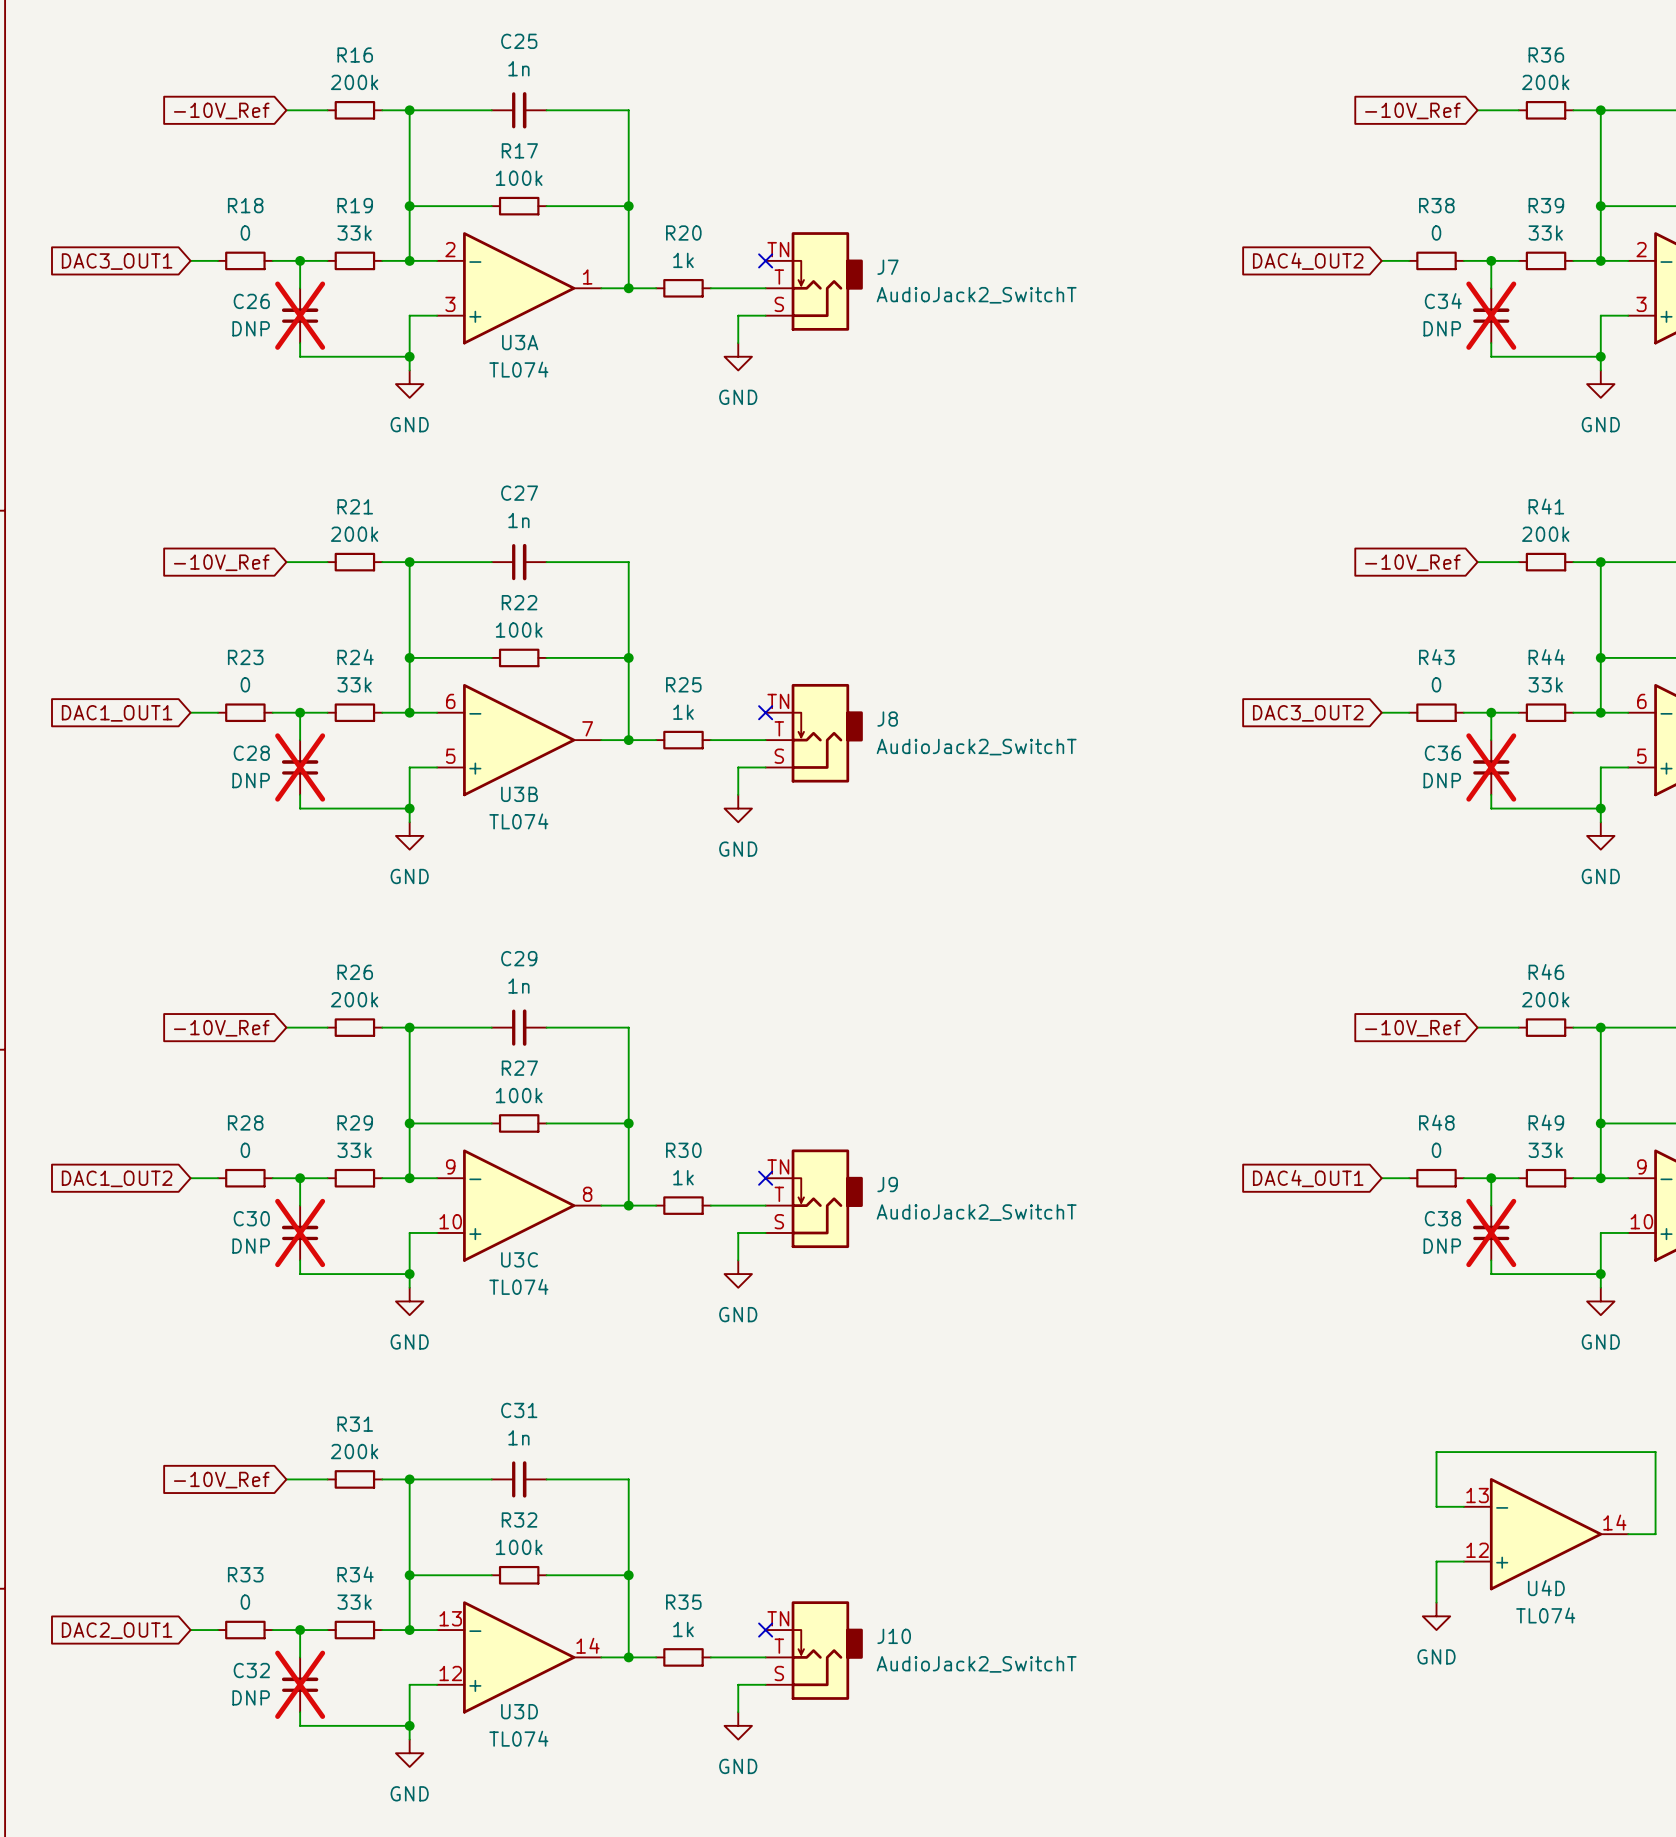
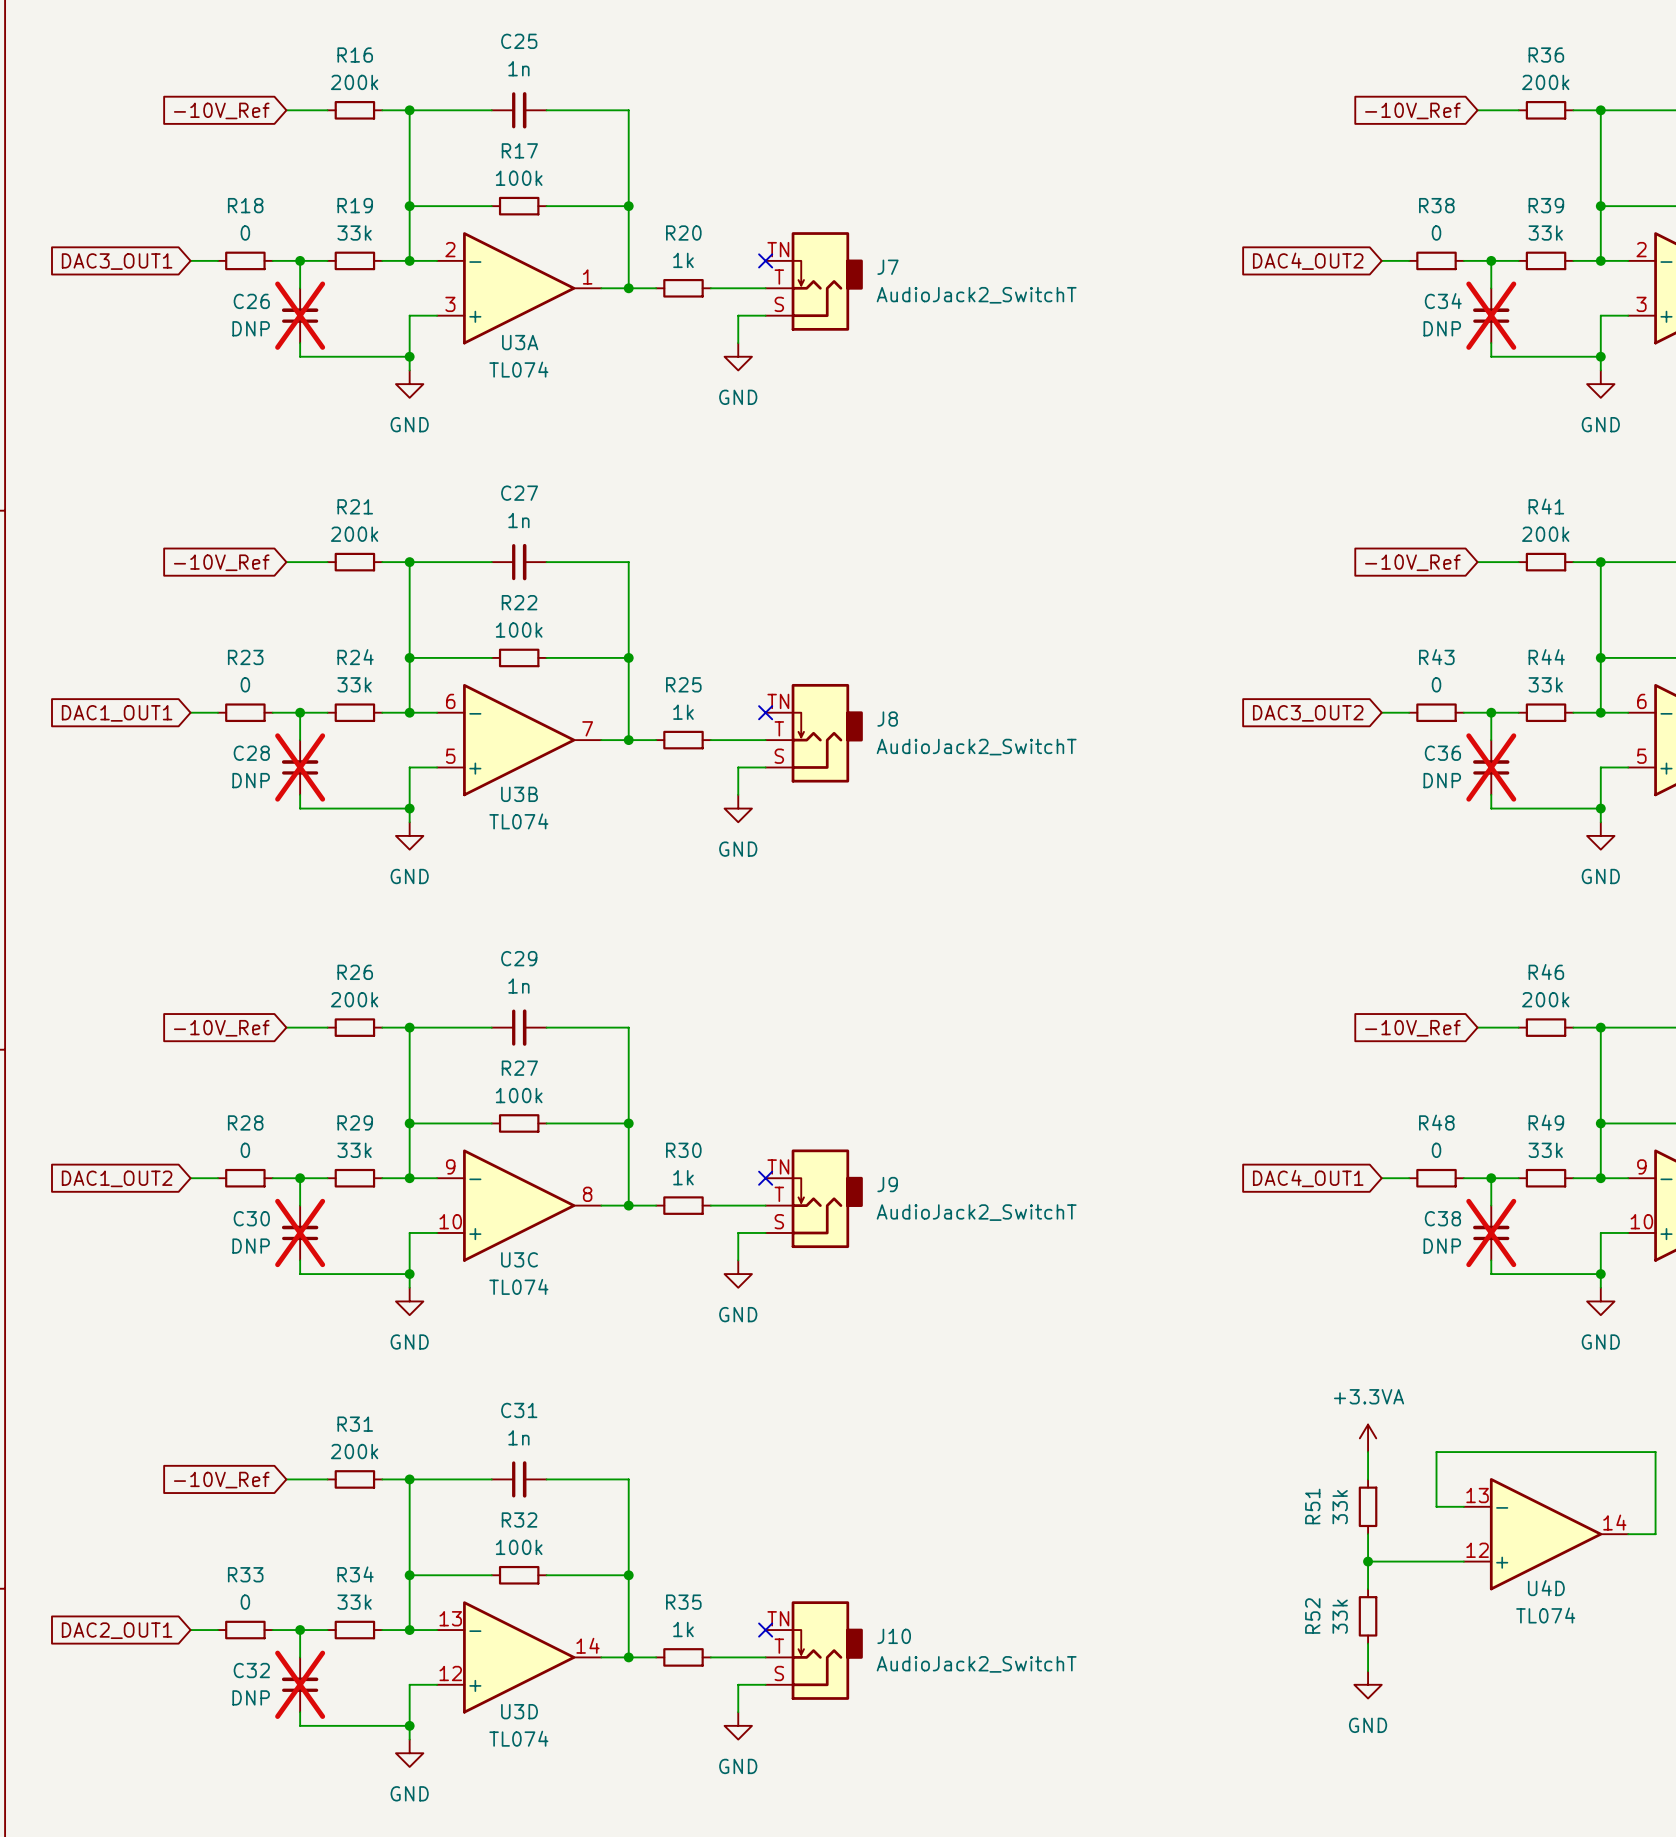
power symbol: none -> +3.3VA (1368, 1438)
wire: none -> (1368, 1452) (1368, 1479)
R51: none -> 33k (1368, 1506)
wire: none -> (1368, 1534) (1368, 1588)
junction: none -> (1368, 1561)
wire: (1436, 1561) (1436, 1602) -> (1436, 1561) (1368, 1561)
R52: none -> 33k (1368, 1616)
power symbol position: GND (1436, 1616) -> GND (1368, 1684)
wire: none -> (1368, 1643) (1368, 1671)

